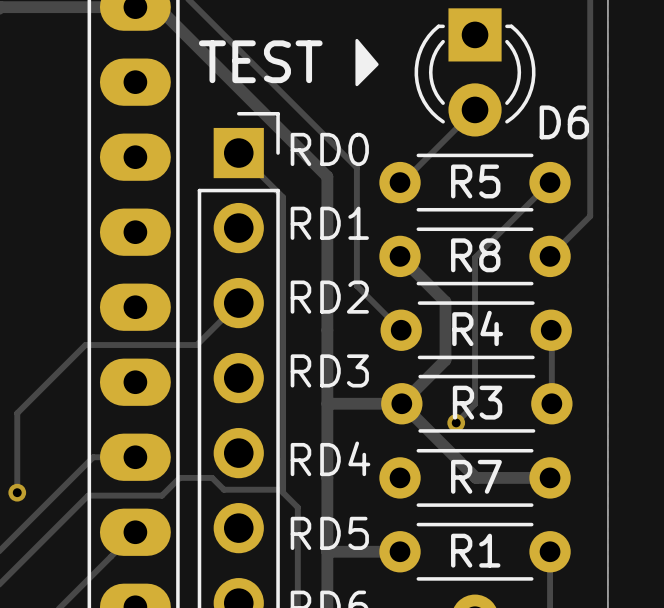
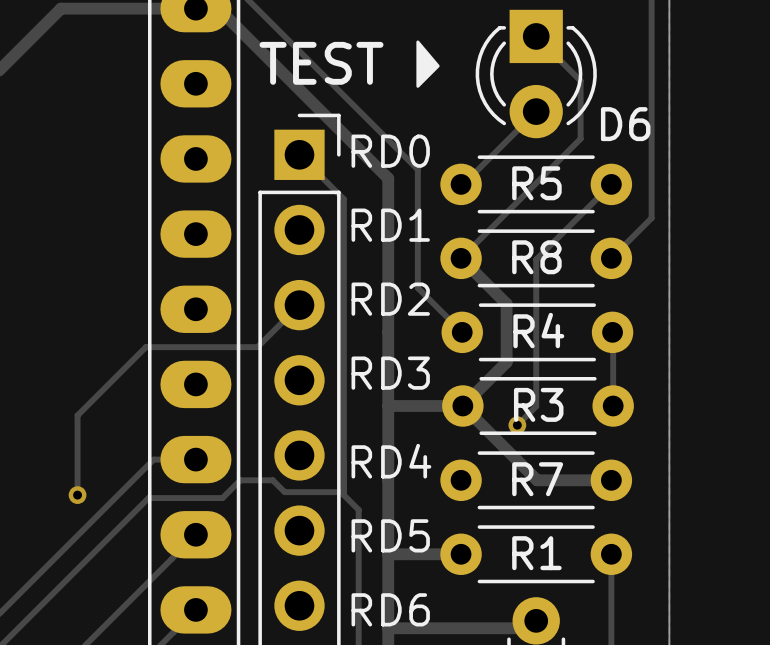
track: none -> (536, 36) (580, 80) (580, 138) (461, 258)

